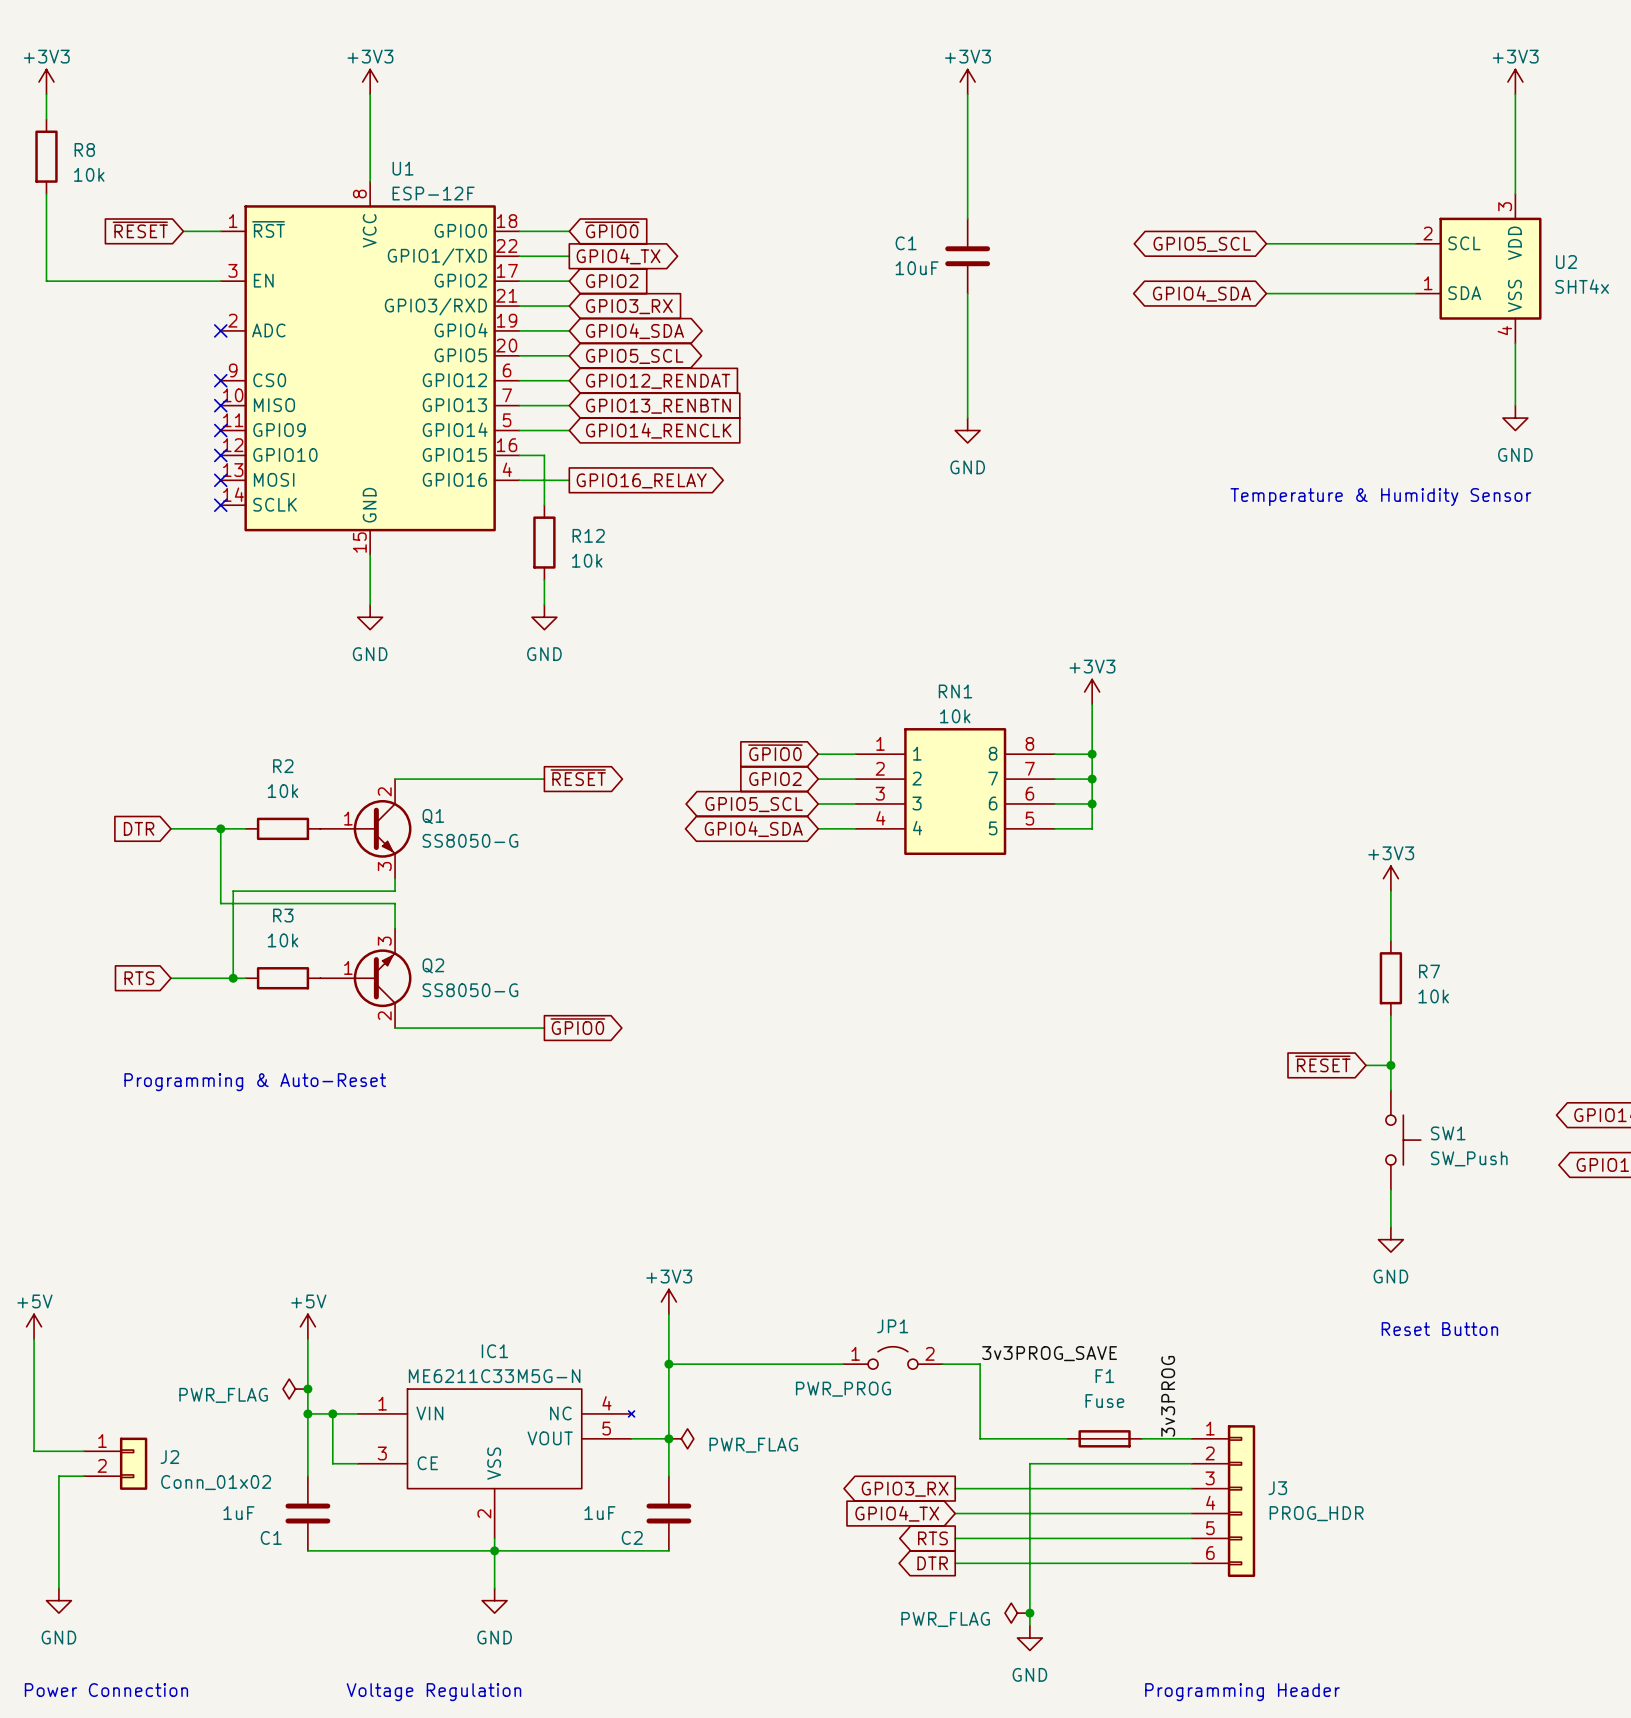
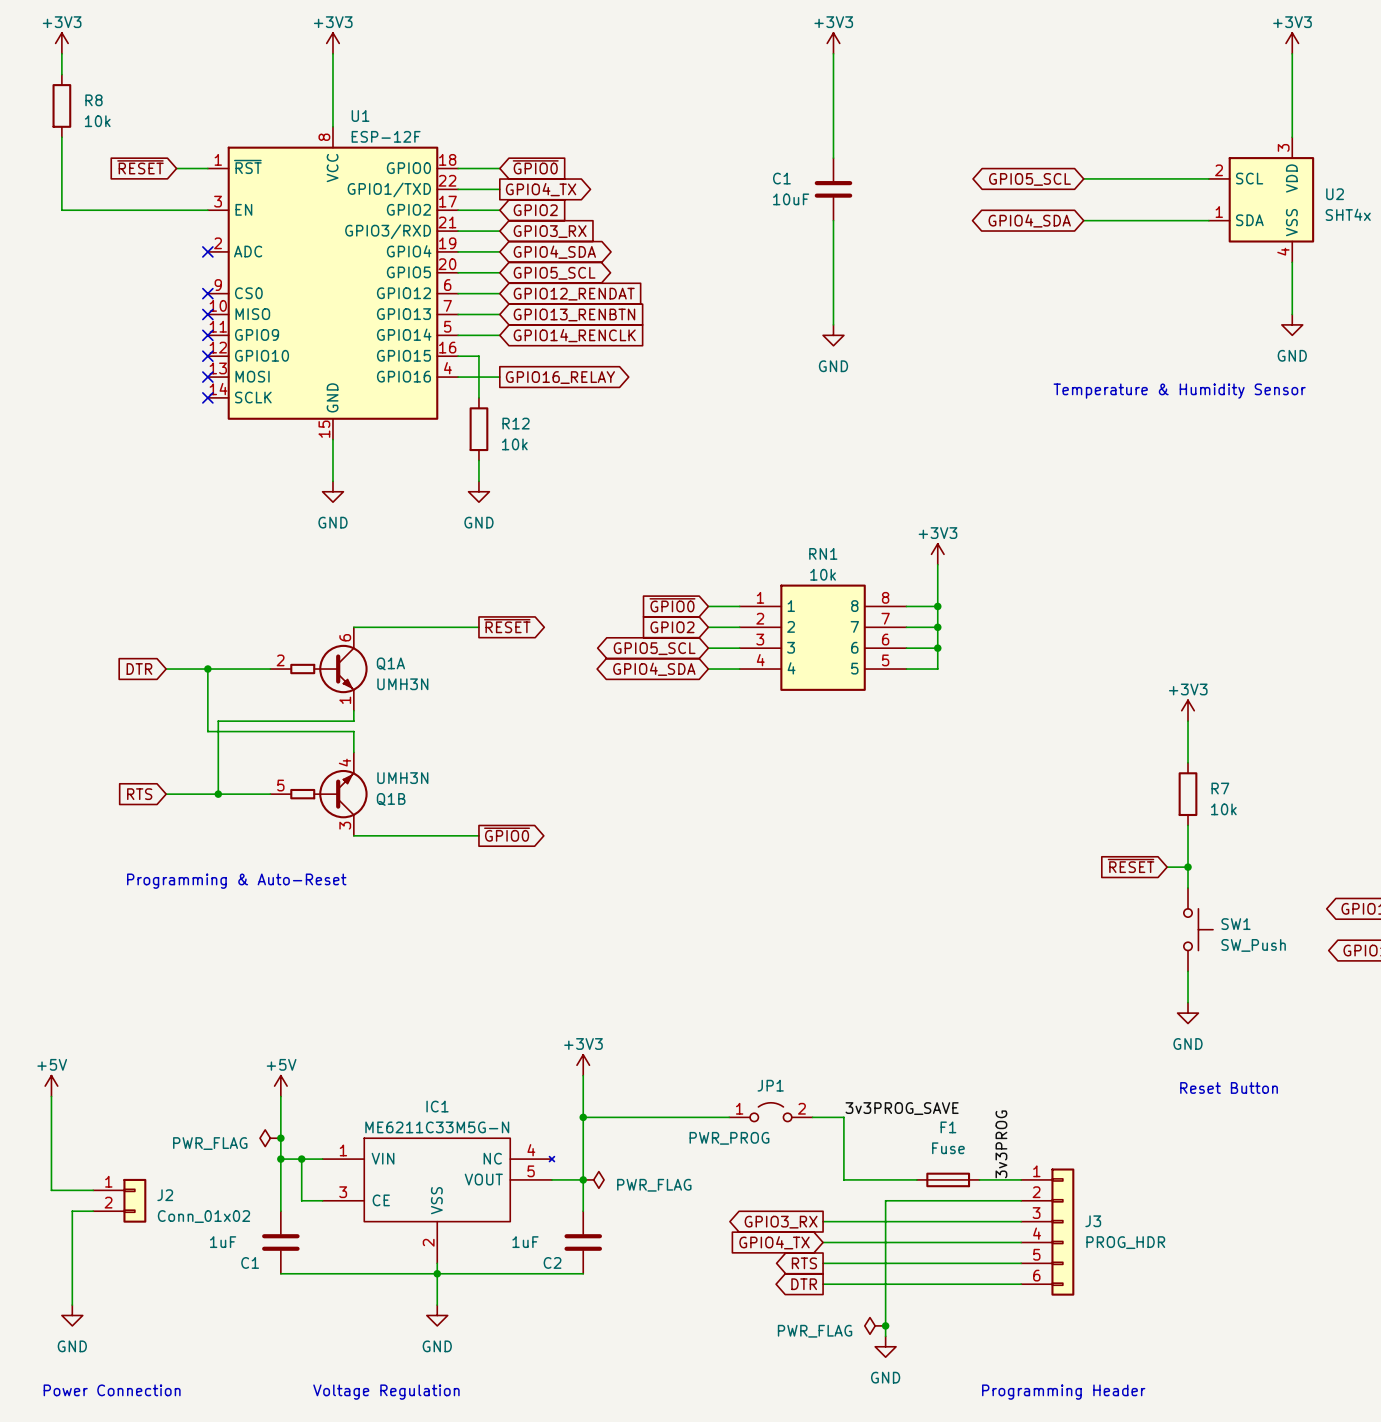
wire: none -> (228, 669) (270, 669)
R2: 10k (283, 828) -> none
Q1A: none -> UMH3N (319, 669)
Q1: SS8050-G (365, 828) -> none
wire: none -> (228, 794) (270, 794)
R3: 10k (283, 978) -> none
Q1B: none -> UMH3N (319, 794)
Q2: SS8050-G (365, 978) -> none

